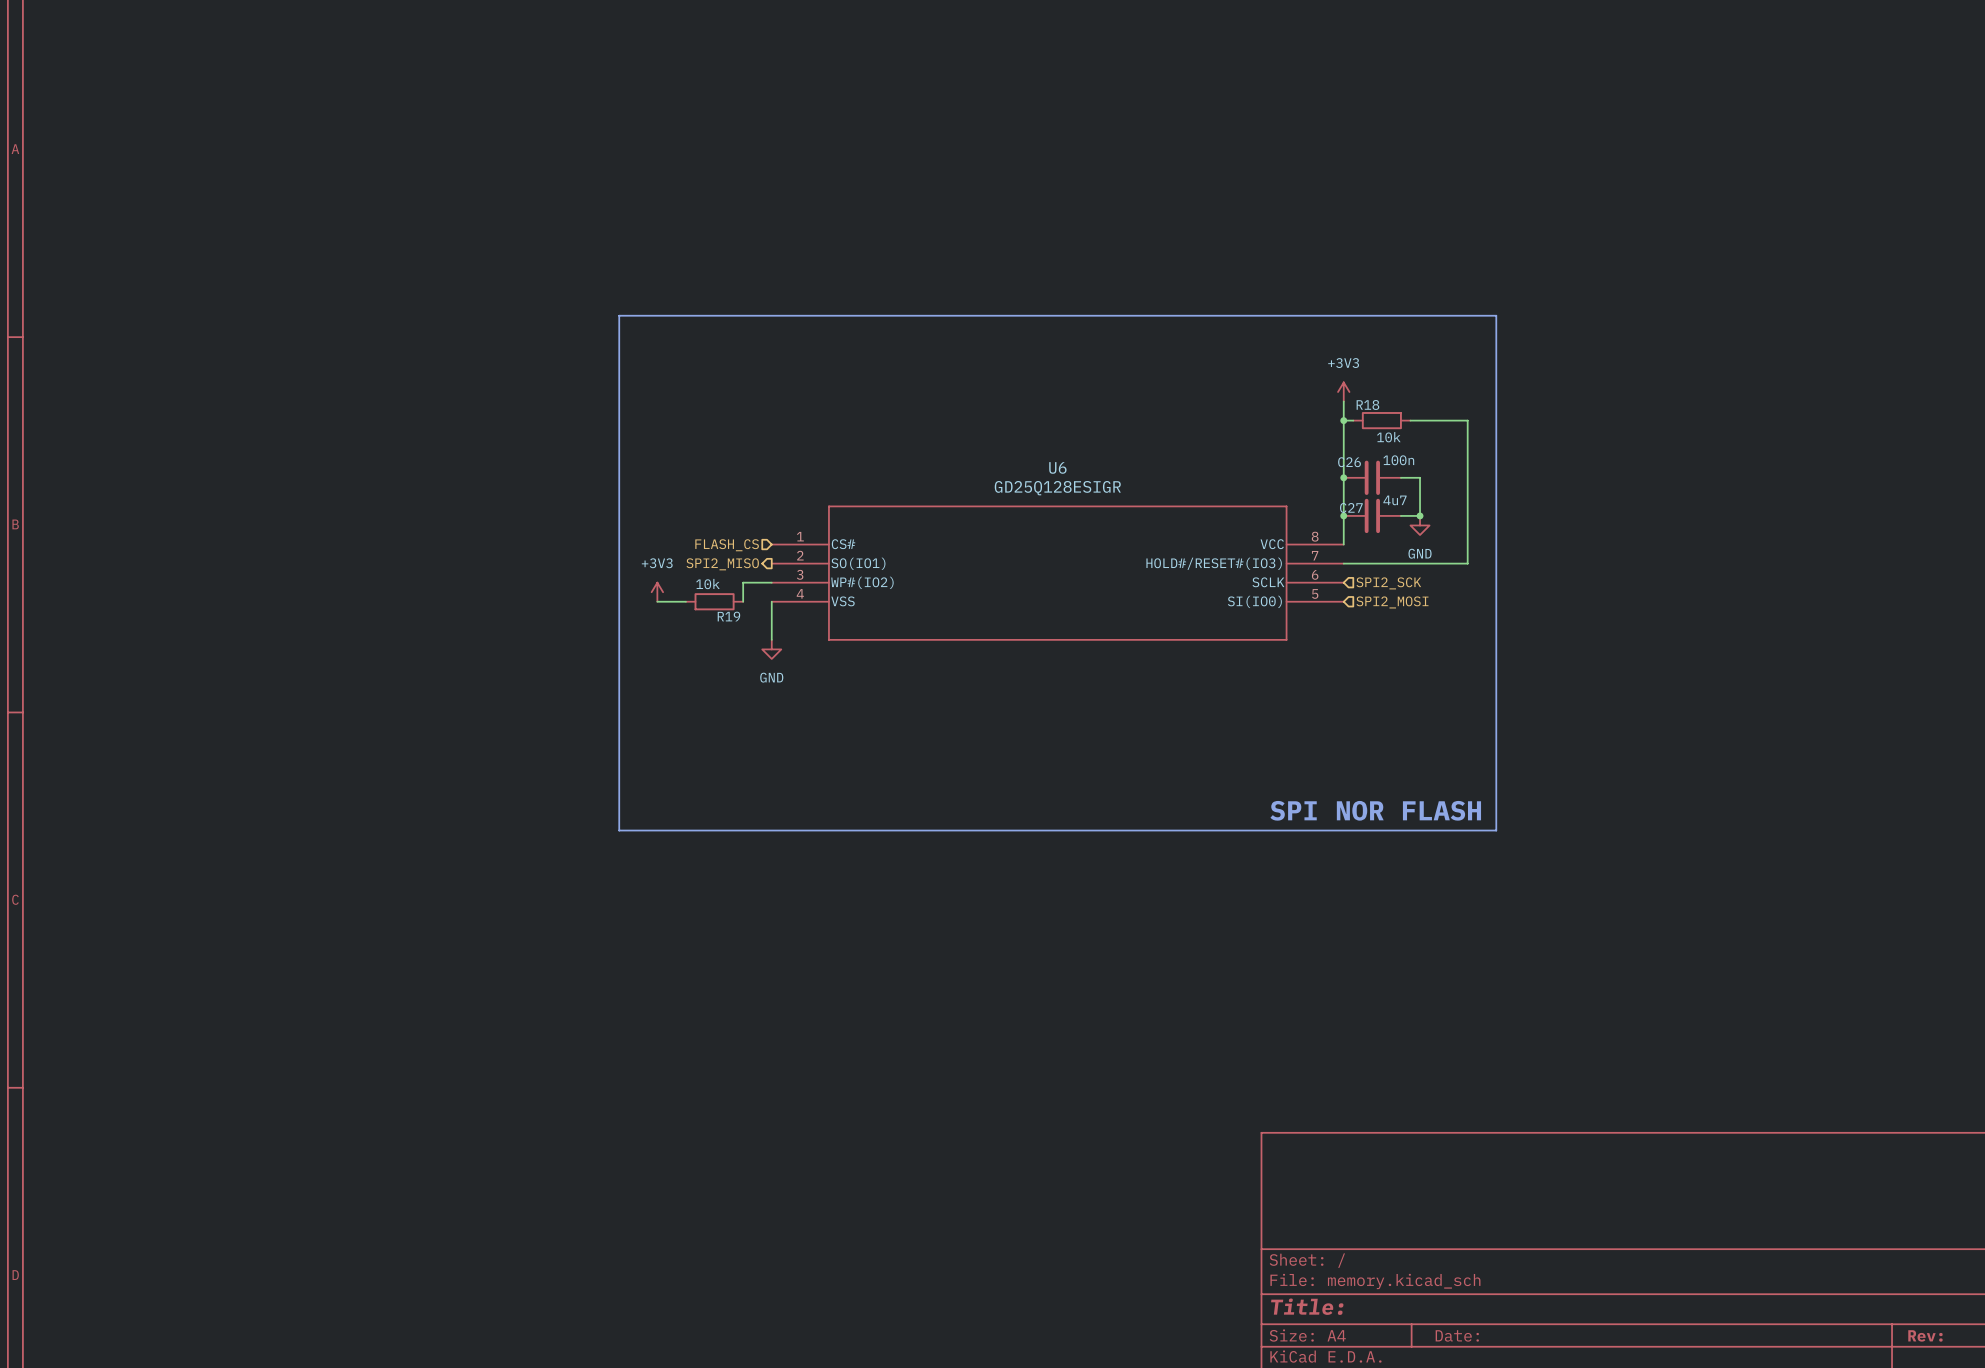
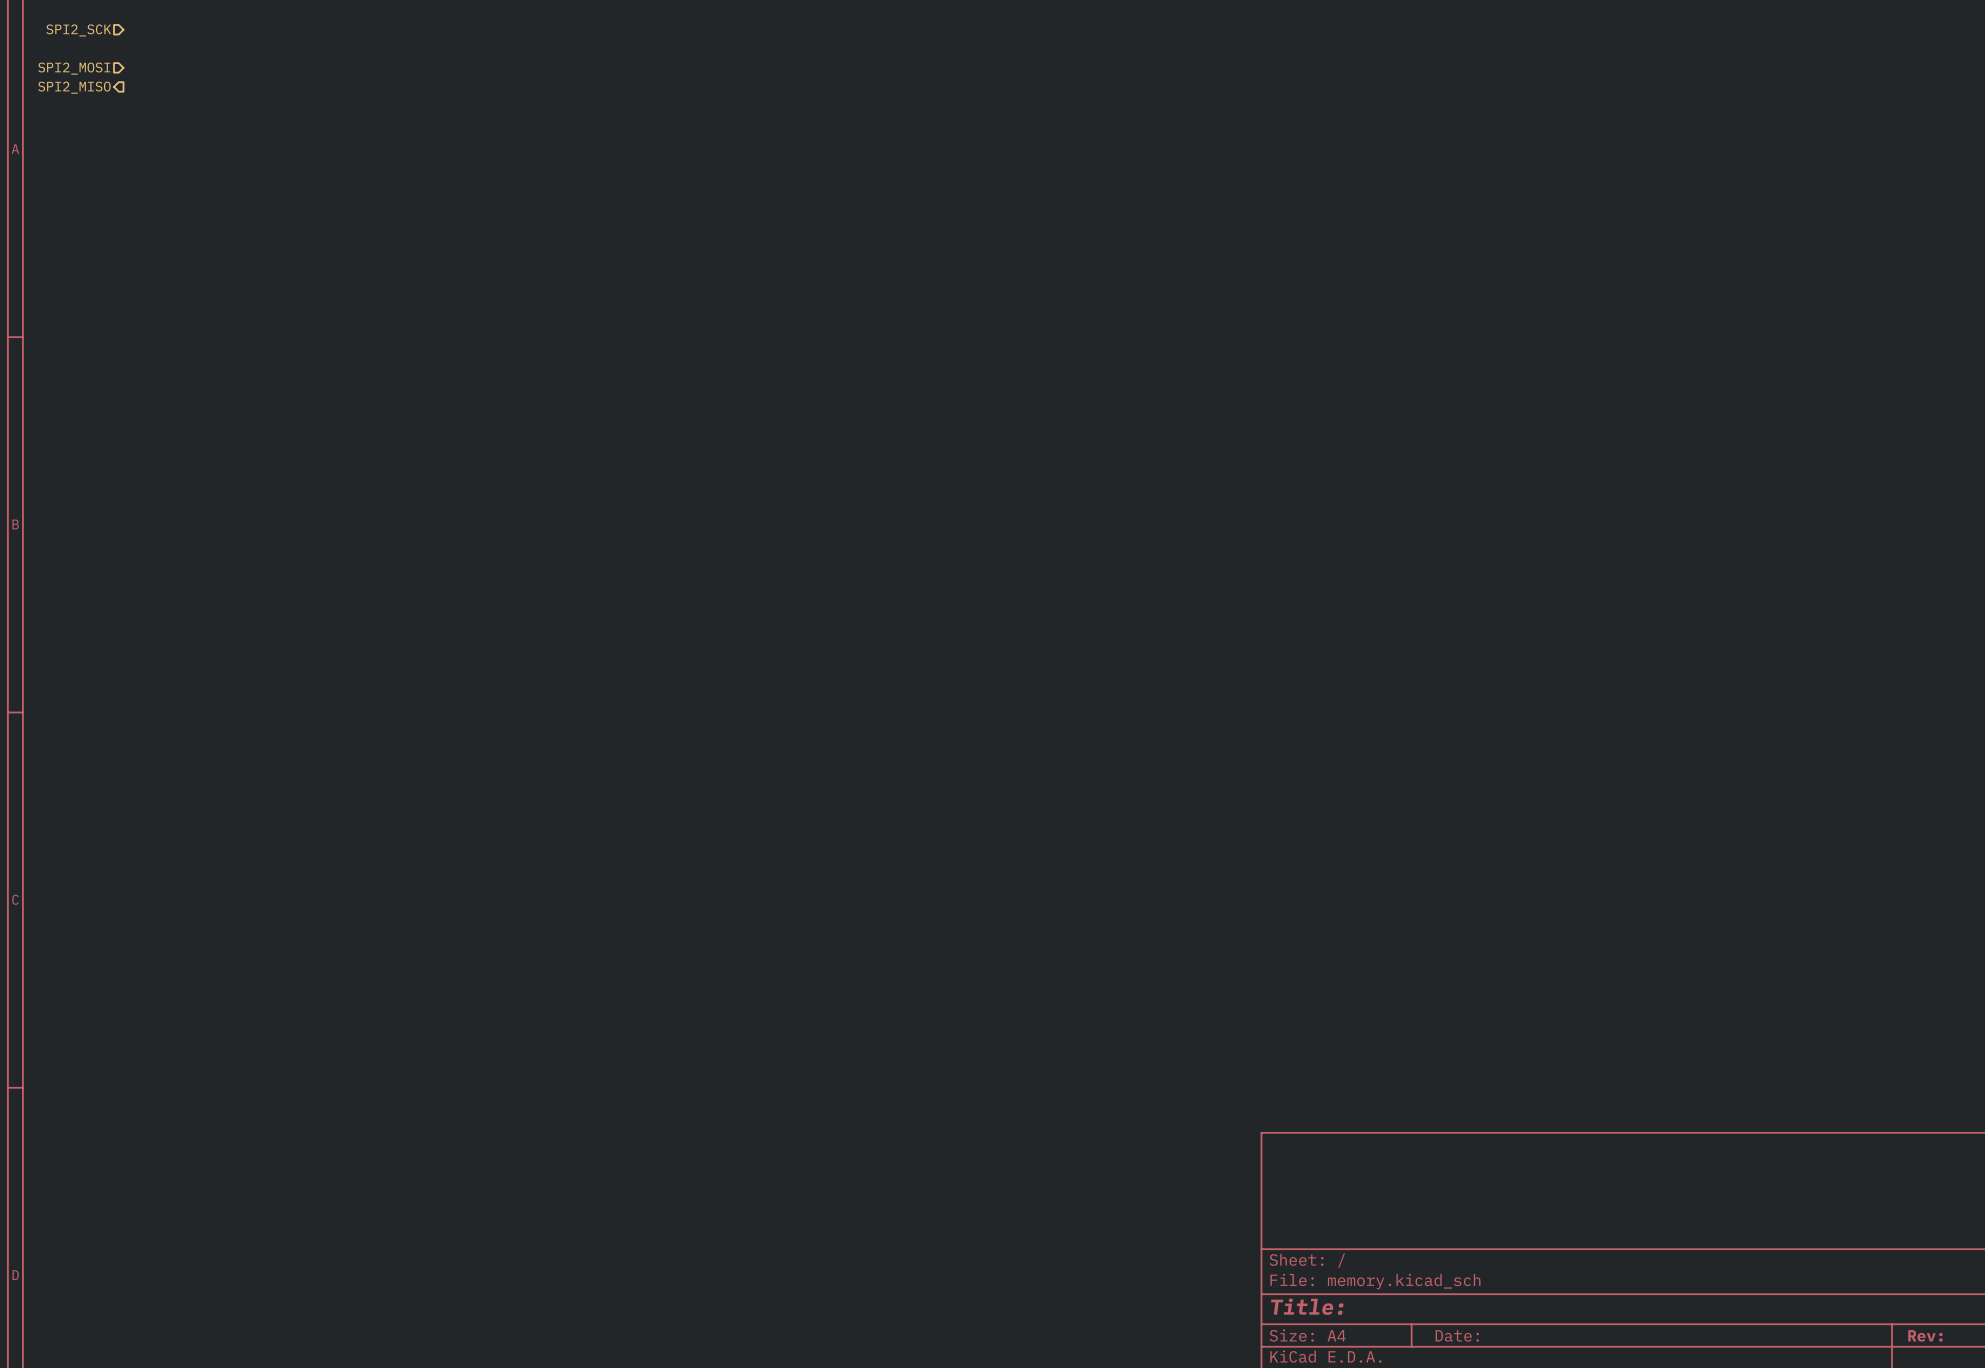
hierarchical label: none -> SPI2_SCK (78, 30)
hierarchical label: none -> SPI2_MOSI (74, 68)
hierarchical label: none -> SPI2_MISO (74, 87)
line: (619, 315) (1496, 315) (1496, 830) (619, 830) (619, 315) -> none
power symbol: +3V3 (1343, 392) -> none
wire: (1343, 401) (1343, 544) -> none
wire: (1343, 420) (1353, 420) -> none
junction: (1343, 420) -> none
R18: 10k (1381, 420) -> none
wire: (1410, 420) (1467, 420) (1467, 563) (1343, 563) -> none
junction: (1343, 477) -> none
C26: 100n (1372, 477) -> none
wire: (1400, 477) (1420, 477) (1420, 515) (1400, 515) -> none
junction: (1343, 515) -> none
C27: 4u7 (1372, 515) -> none
junction: (1420, 515) -> none
power symbol: GND (1420, 525) -> none
hierarchical label: FLASH_CS (727, 545) -> none
hierarchical label: SPI2_MISO (722, 564) -> none
U6: GD25Q128ESIGR (1057, 573) -> none
wire: (771, 582) (743, 582) (743, 601) -> none
hierarchical label: SPI2_SCK (1388, 583) -> none
power symbol: +3V3 (657, 592) -> none
wire: (657, 601) (685, 601) -> none
R19: 10k (714, 601) -> none
wire: (771, 601) (771, 639) -> none
hierarchical label: SPI2_MOSI (1392, 602) -> none
power symbol: GND (771, 649) -> none
text: SPI NOR FLASH (1375, 810) -> none

